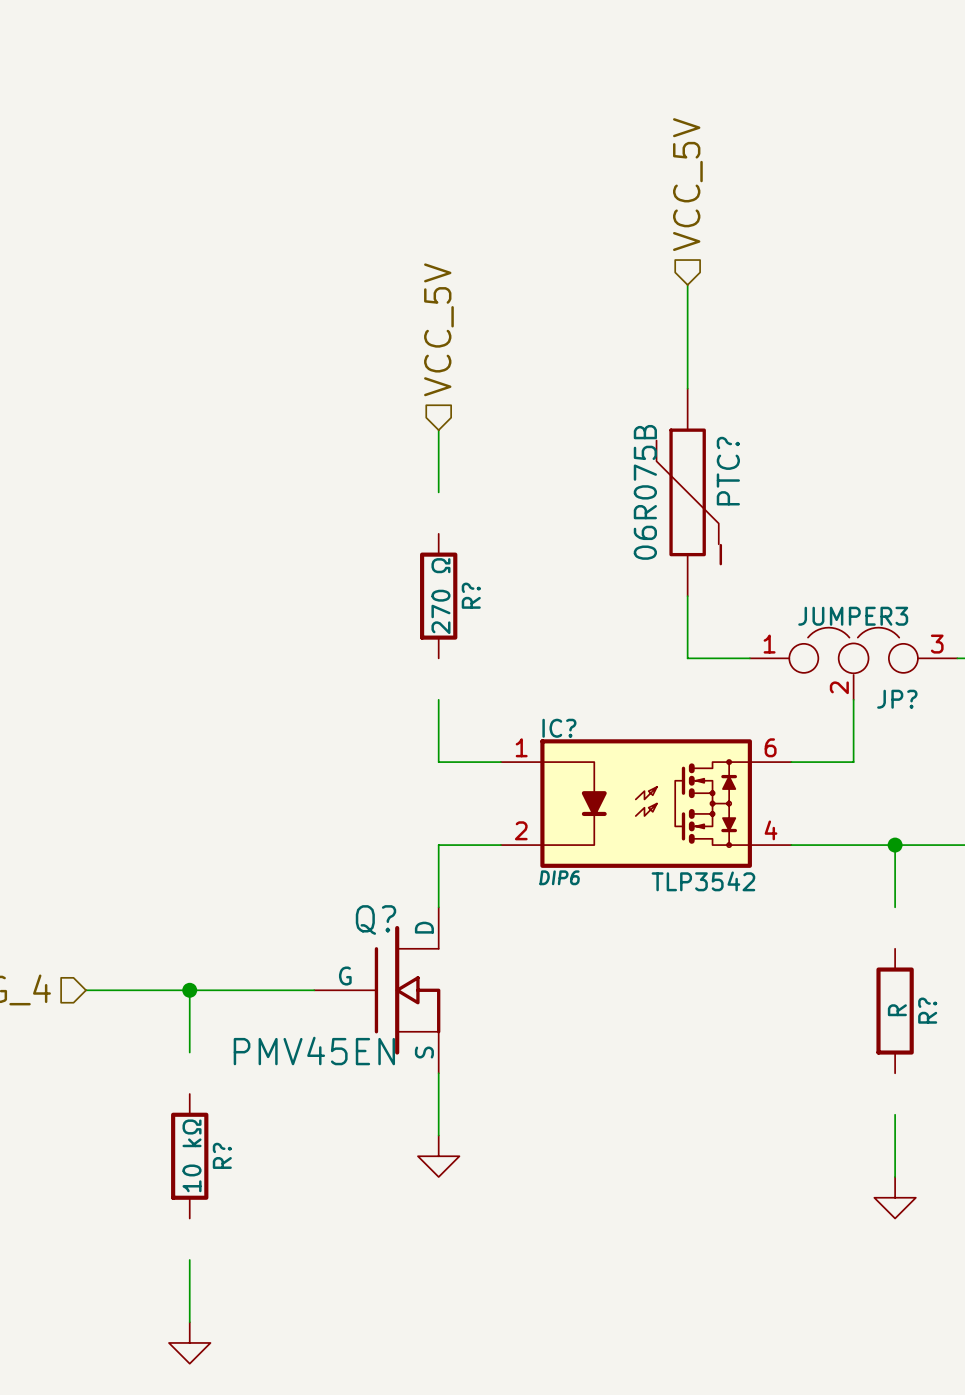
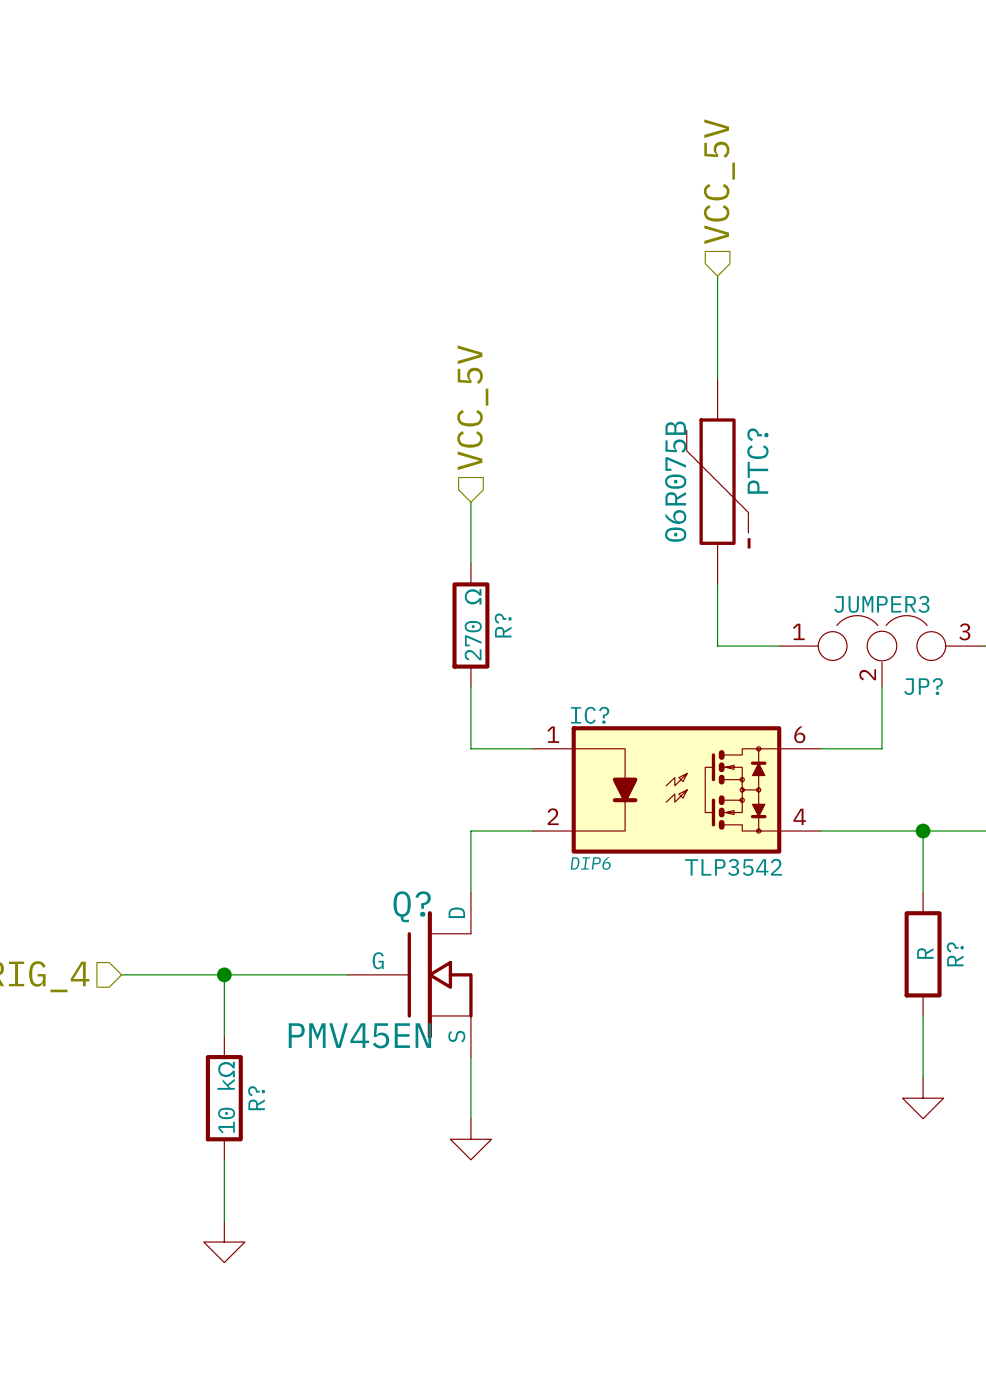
hierarchical label position: VCC_5V (438, 329) -> VCC_5V (472, 407)
wire: (438, 430) (438, 492) -> (470, 502) (470, 563)
R? position: (438, 596) -> (470, 625)
R? position: (895, 1011) -> (923, 954)
wire: (895, 1114) (895, 1177) -> (923, 1015) (923, 1077)
R? position: (189, 1156) -> (224, 1098)
power symbol position: (895, 1197) -> (923, 1098)
wire: (189, 1259) (189, 1322) -> (224, 1159) (224, 1221)
power symbol position: (189, 1342) -> (224, 1242)

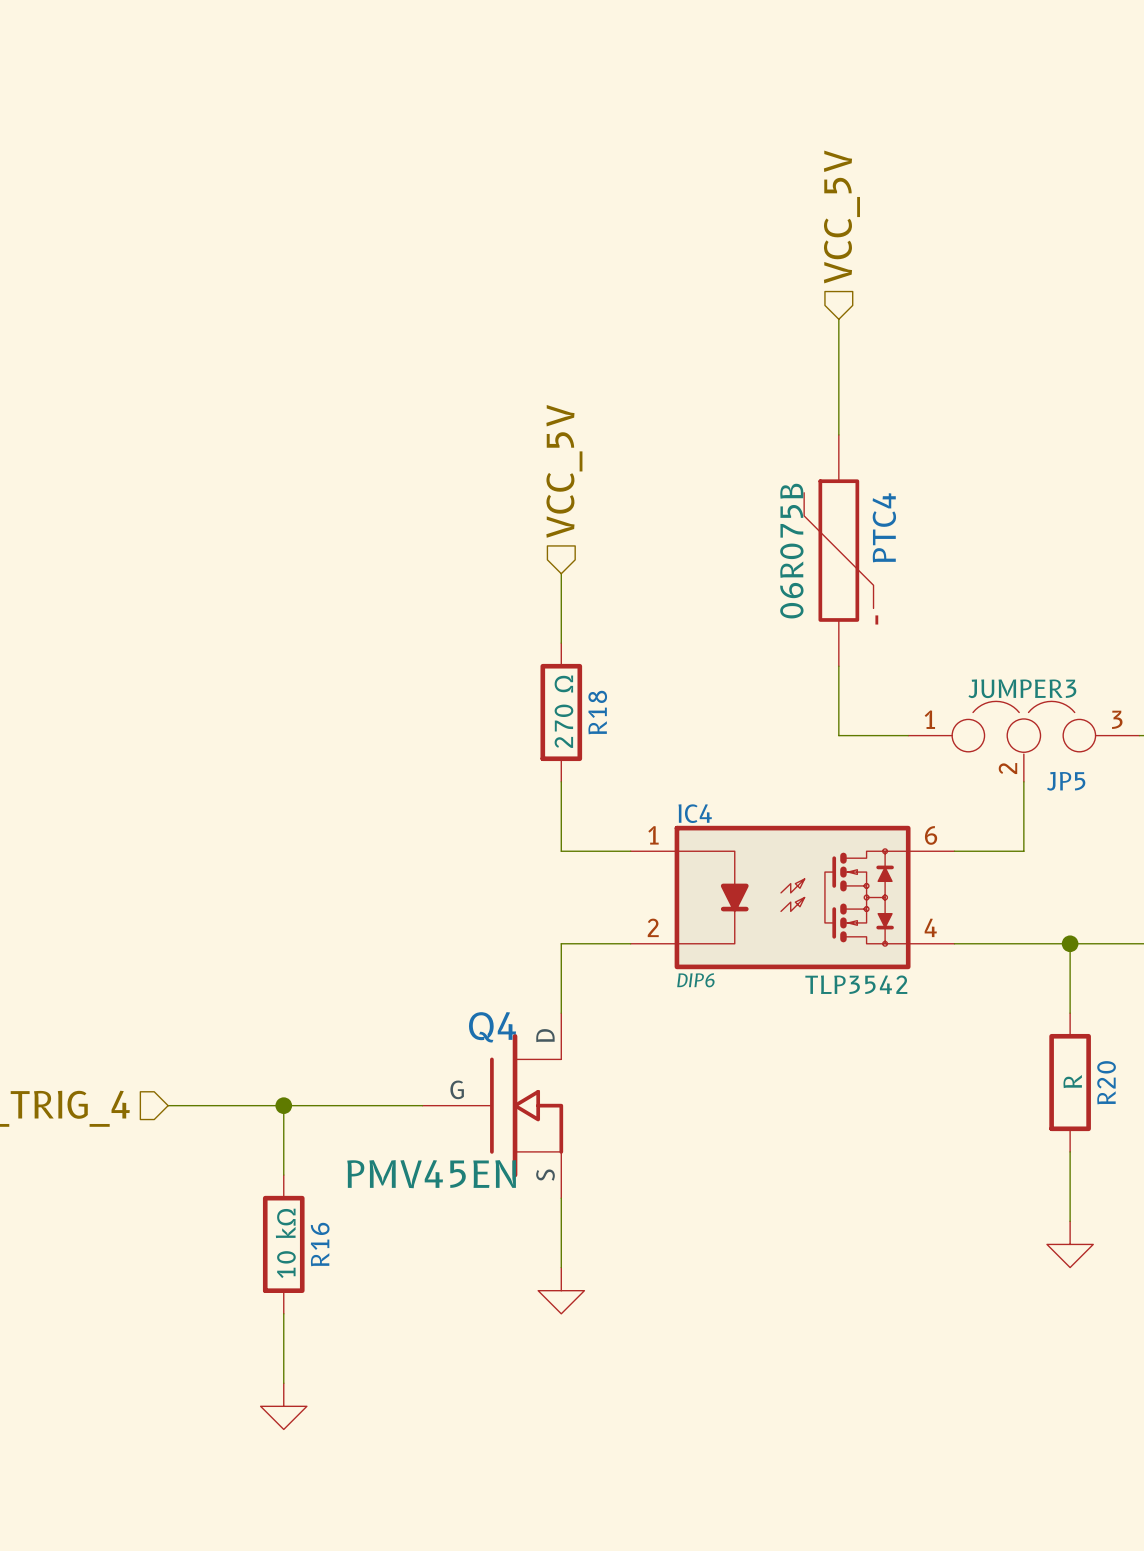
PTC? name: PTC? (757, 461) -> PTC4 (884, 527)
R? name: R? (503, 625) -> R18 (597, 712)
JP? name: JP? (923, 686) -> JP5 (1066, 781)
IC? name: IC? (590, 715) -> IC4 (695, 813)
Q? name: Q? (412, 906) -> Q4 (492, 1027)
R? name: R? (955, 954) -> R20 (1106, 1082)
R? name: R? (256, 1098) -> R16 (320, 1244)

